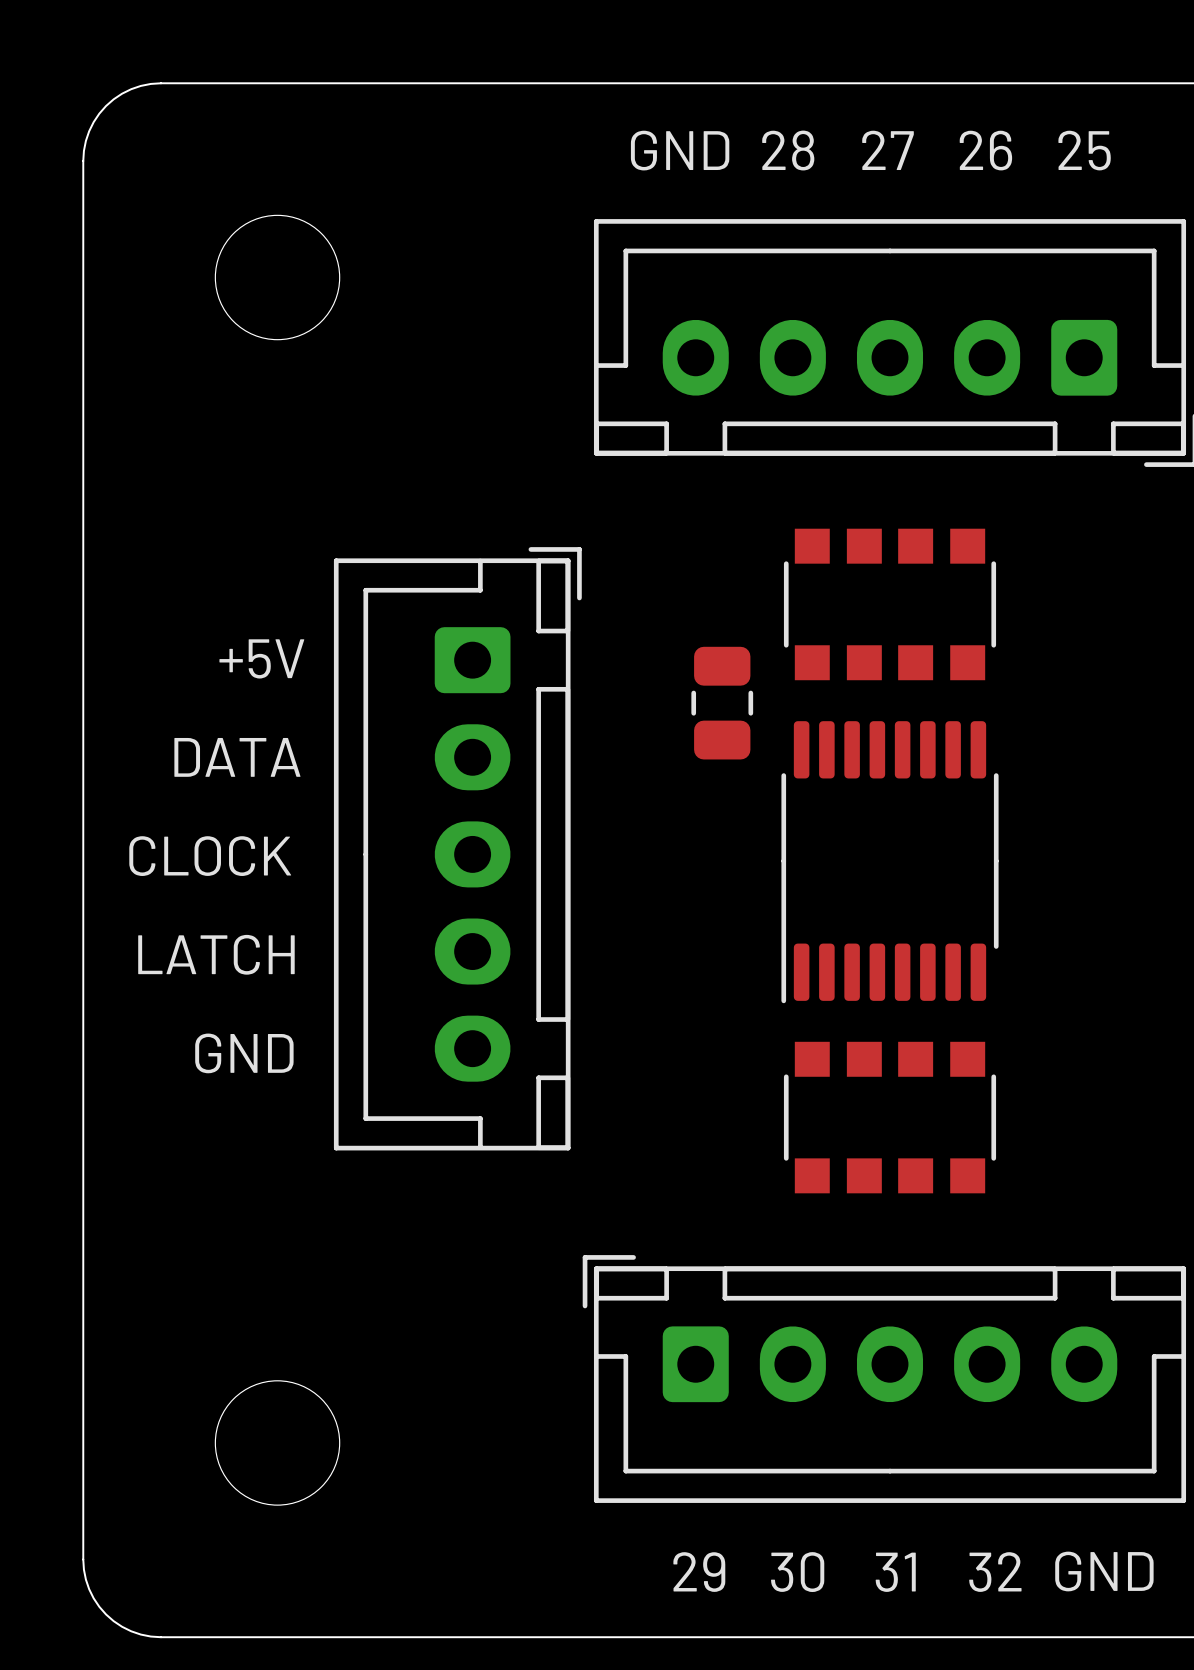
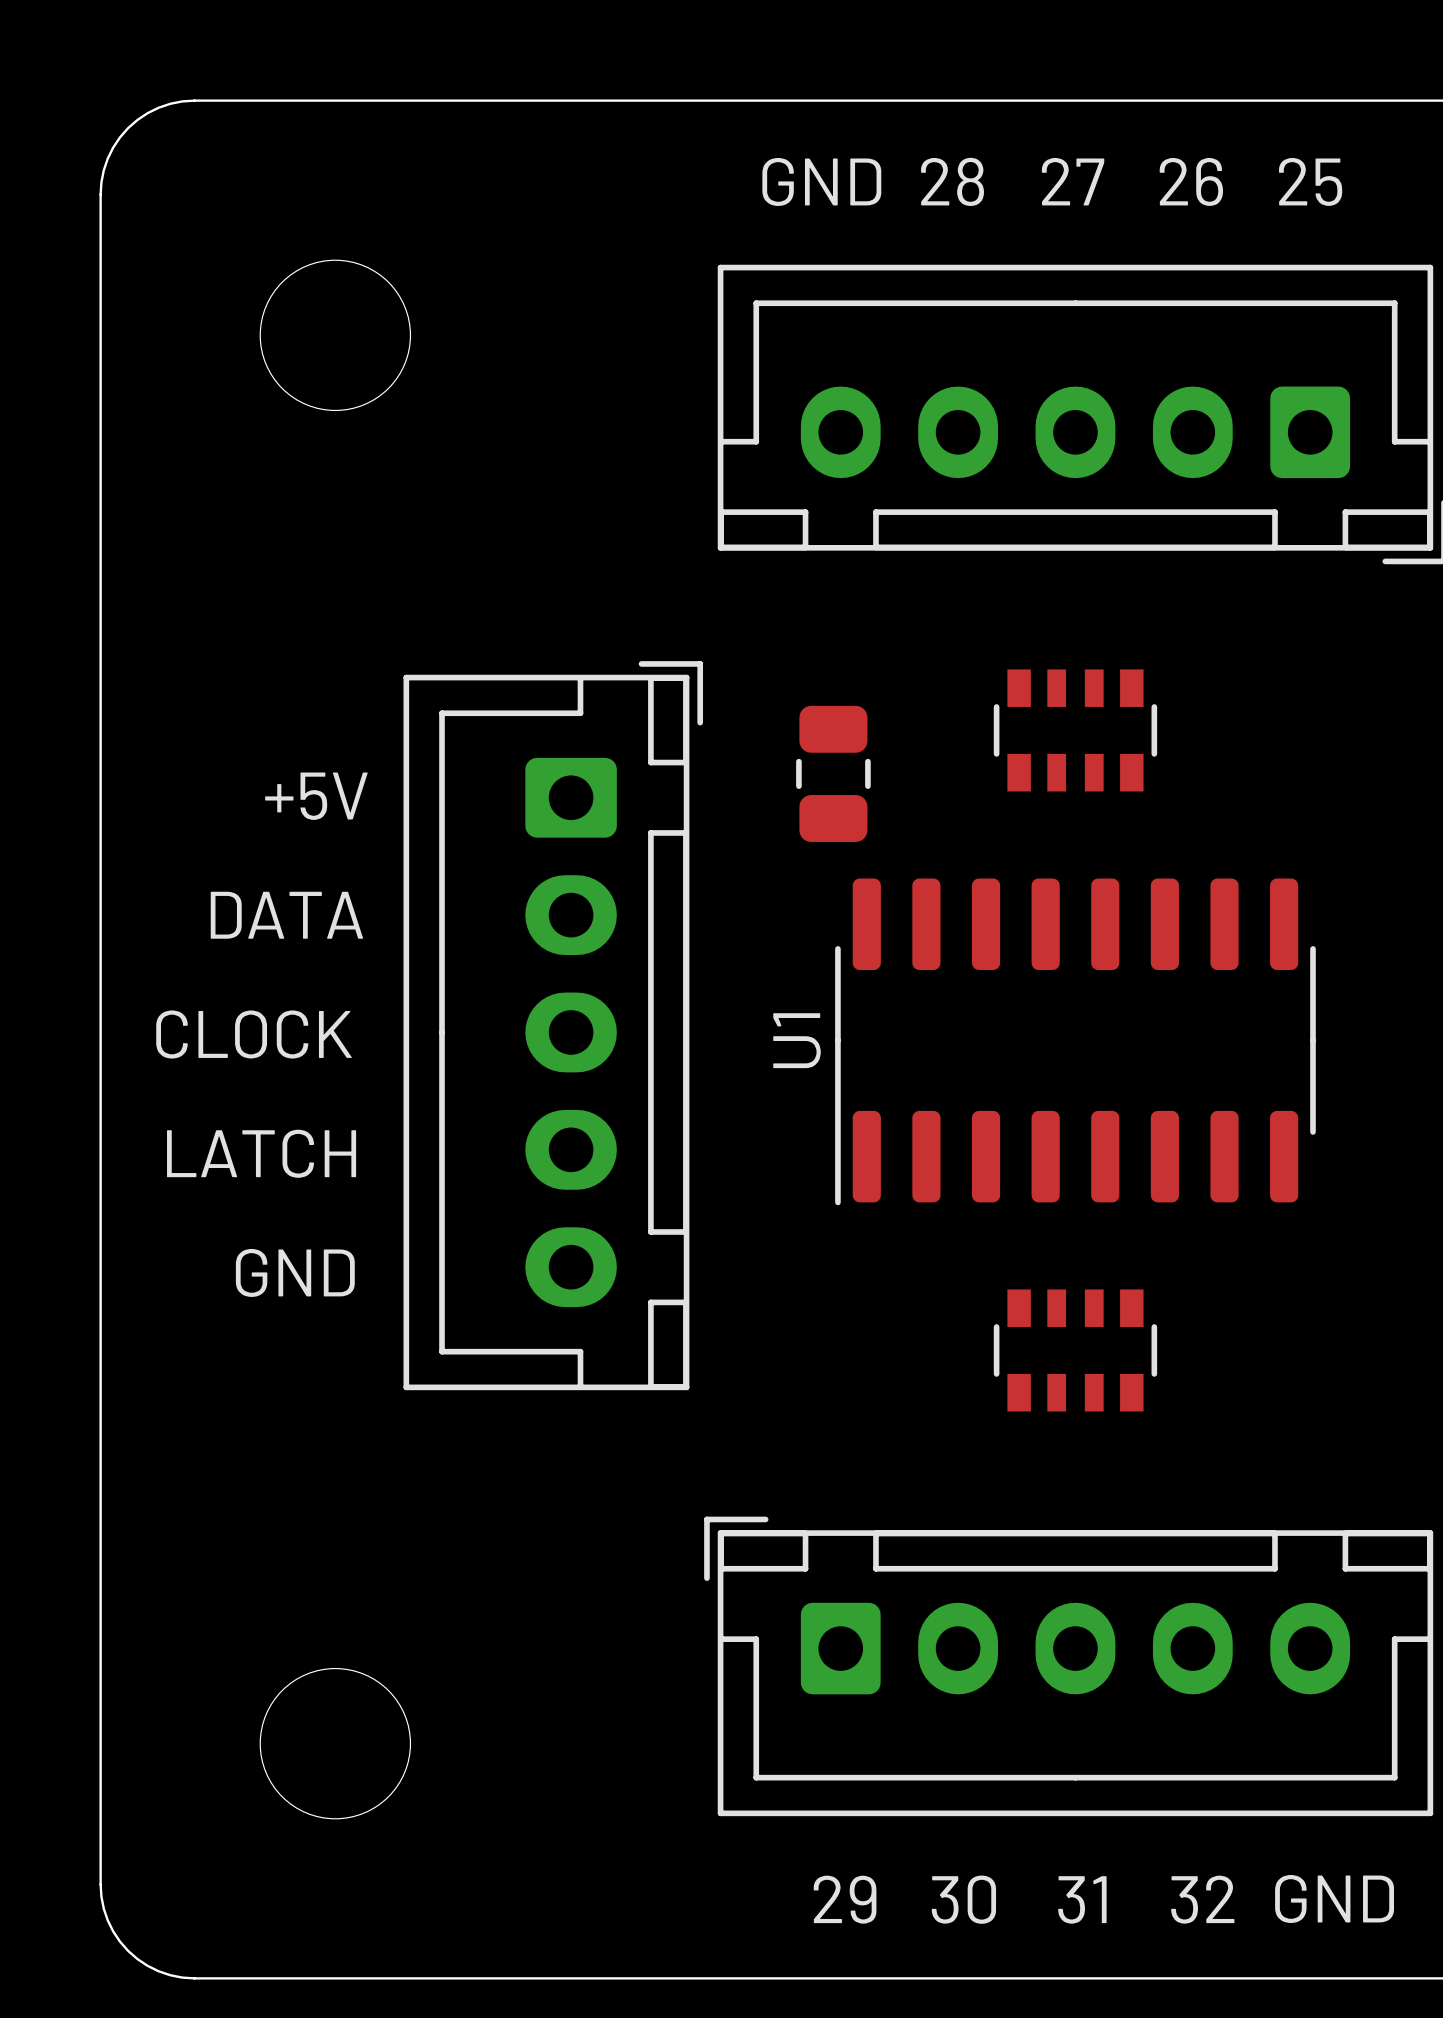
part footprint: [783, 528, 997, 681] -> [993, 669, 1158, 792]
part position: (722, 703) -> (833, 773)
part: (890, 862) -> none
U1: none -> (1075, 1041)
part footprint: [783, 1041, 997, 1194] -> [993, 1289, 1158, 1412]

